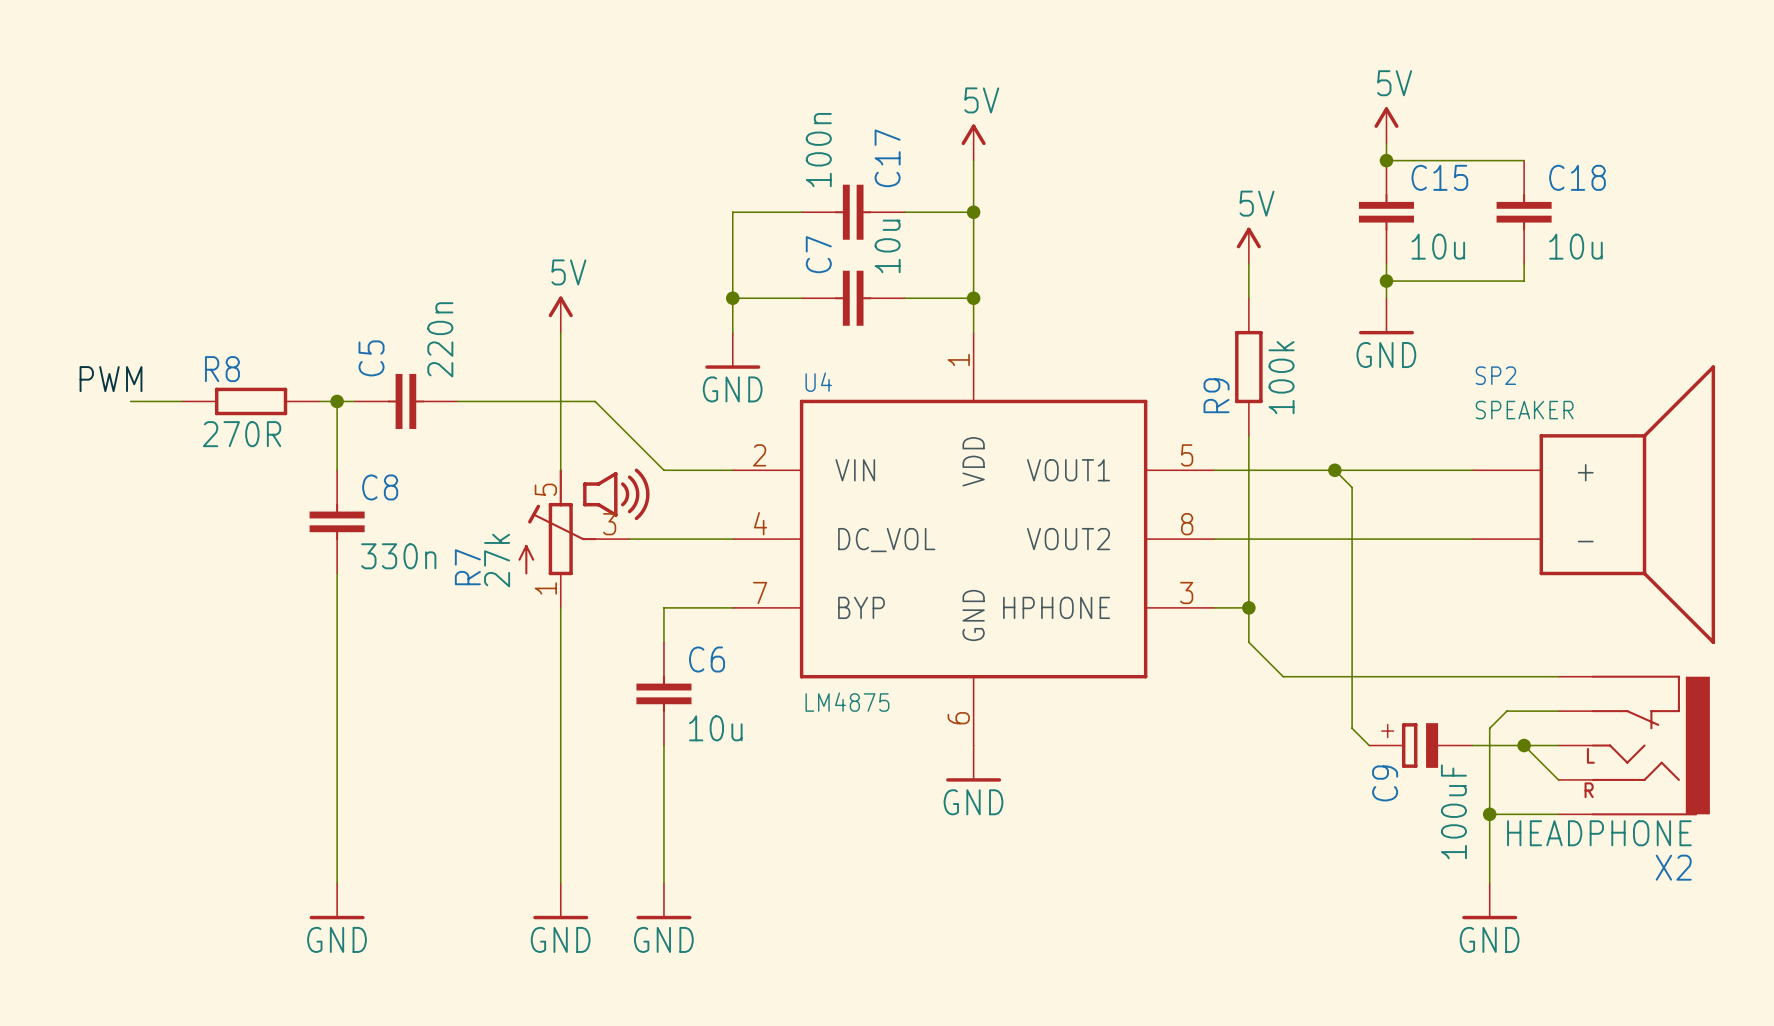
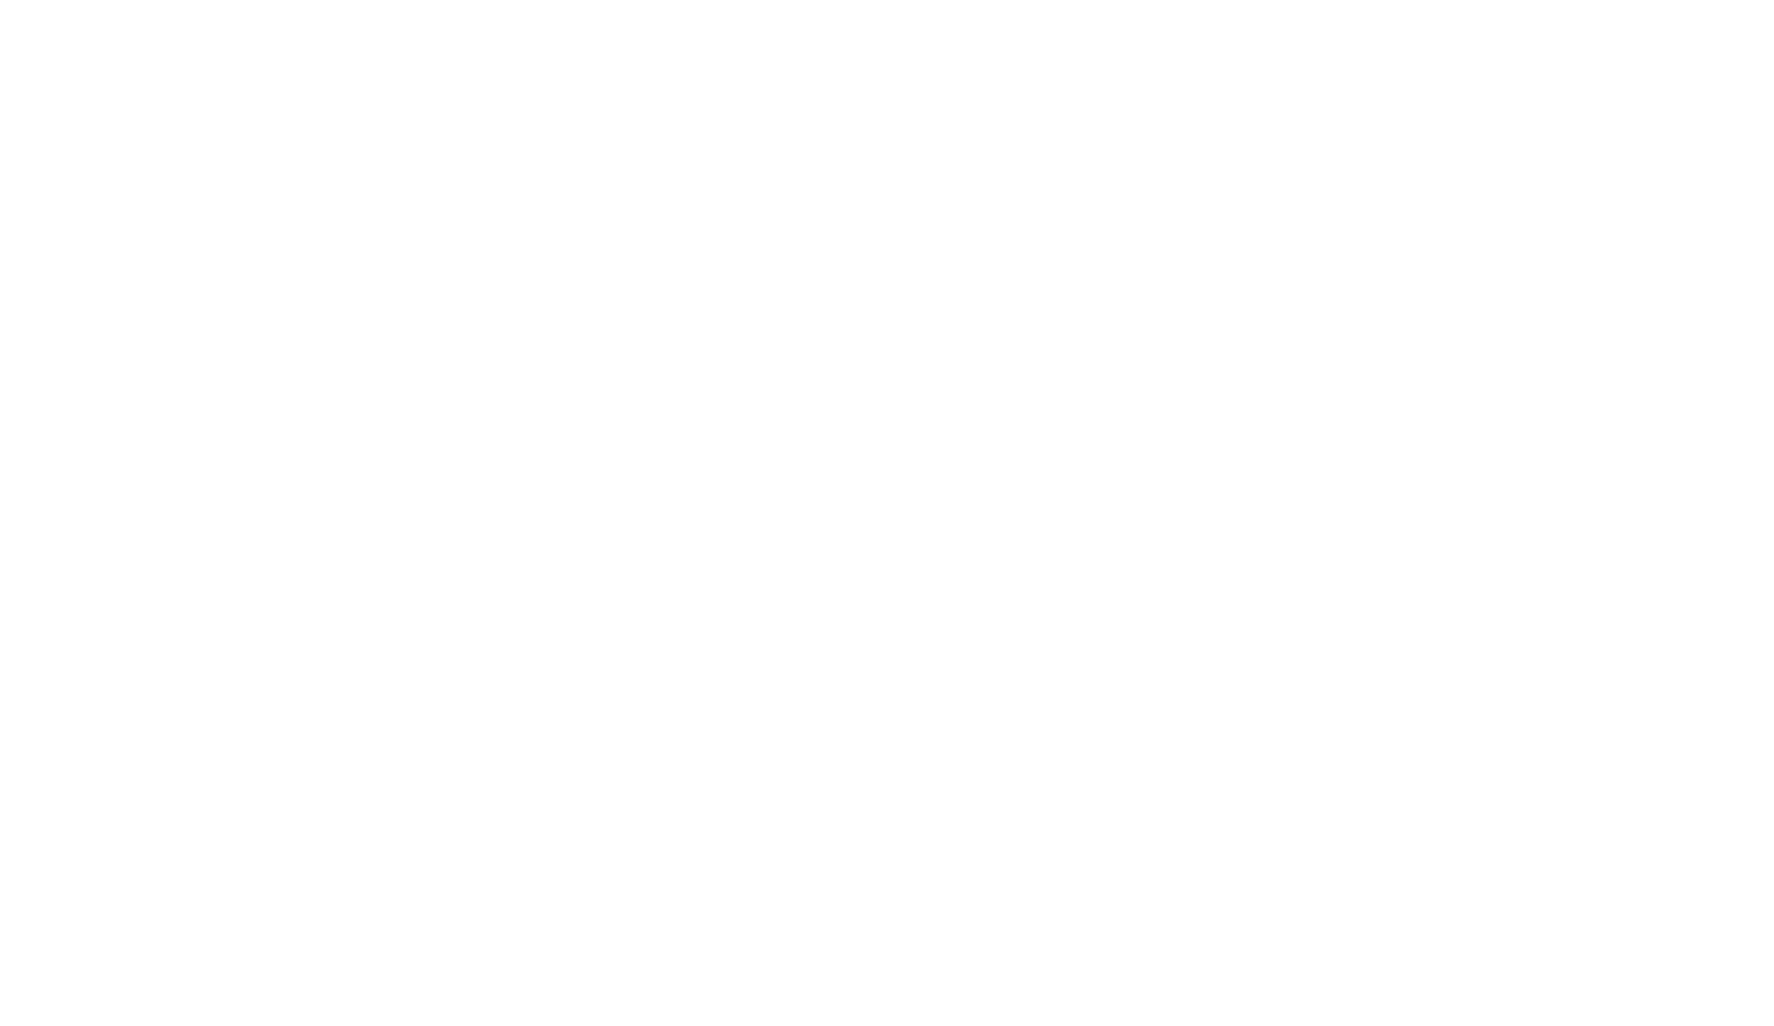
power symbol: 5V (1386, 125) -> none
power symbol: 5V (973, 142) -> none
wire: (1386, 143) (1386, 160) (1524, 160) -> none
wire: (973, 160) (973, 332) -> none
junction: (1386, 160) -> none
wire: (801, 212) (732, 212) (732, 332) -> none
C17: 100n (853, 212) -> none
wire: (904, 212) (973, 212) -> none
junction: (973, 212) -> none
C15: 10u (1386, 212) -> none
C18: 10u (1524, 212) -> none
power symbol: 5V (1248, 245) -> none
wire: (1248, 263) (1248, 298) -> none
wire: (1386, 263) (1386, 298) -> none
wire: (1524, 263) (1524, 281) (1386, 281) -> none
junction: (1386, 281) -> none
wire: (732, 298) (801, 298) -> none
junction: (732, 298) -> none
C7: 10u (853, 298) -> none
wire: (904, 298) (973, 298) -> none
junction: (973, 298) -> none
power symbol: 5V (560, 314) -> none
power symbol: GND (1386, 316) -> none
wire: (560, 332) (560, 470) -> none
power symbol: GND (732, 350) -> none
R9: 100k (1248, 367) -> none
label: PWM (111, 379) -> none
wire: (130, 401) (182, 401) -> none
R8: 270R (251, 401) -> none
wire: (319, 401) (354, 401) -> none
wire: (337, 401) (337, 470) -> none
junction: (337, 401) -> none
C5: 220n (405, 401) -> none
wire: (457, 401) (595, 401) (663, 470) (732, 470) -> none
wire: (1248, 435) (1248, 642) (1283, 676) (1558, 676) -> none
wire: (1214, 470) (1472, 470) -> none
wire: (1334, 470) (1352, 487) (1352, 728) (1369, 745) -> none
junction: (1334, 470) -> none
SP2: SPEAKER (1593, 504) -> none
C8: 330n (337, 521) -> none
R7: 27k (584, 538) -> none
wire: (629, 539) (732, 539) -> none
U4: LM4875 (973, 539) -> none
wire: (1214, 539) (1472, 539) -> none
wire: (337, 573) (337, 883) -> none
wire: (560, 607) (560, 883) -> none
wire: (732, 607) (663, 607) (663, 642) -> none
wire: (1214, 607) (1248, 607) -> none
junction: (1248, 607) -> none
C6: 10u (663, 693) -> none
wire: (1558, 711) (1506, 711) (1489, 728) (1489, 883) -> none
wire: (663, 745) (663, 883) -> none
C9: 100uF (1420, 745) -> none
wire: (1472, 745) (1558, 745) -> none
wire: (1524, 745) (1558, 779) -> none
junction: (1524, 745) -> none
X2: HEADPHONE (1634, 745) -> none
power symbol: GND (973, 763) -> none
wire: (1489, 814) (1558, 814) -> none
junction: (1489, 814) -> none
power symbol: GND (337, 901) -> none
power symbol: GND (560, 901) -> none
power symbol: GND (663, 901) -> none
power symbol: GND (1489, 901) -> none

